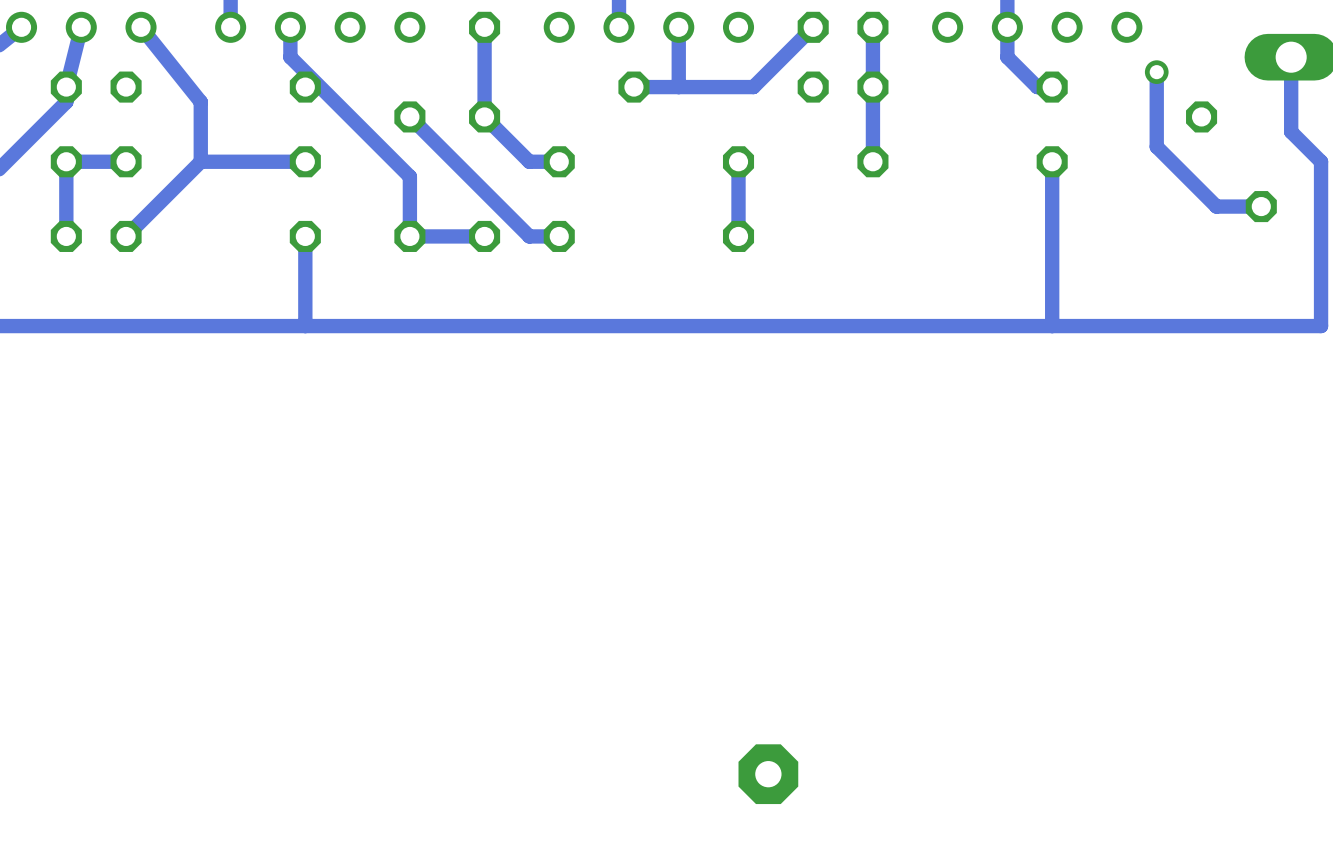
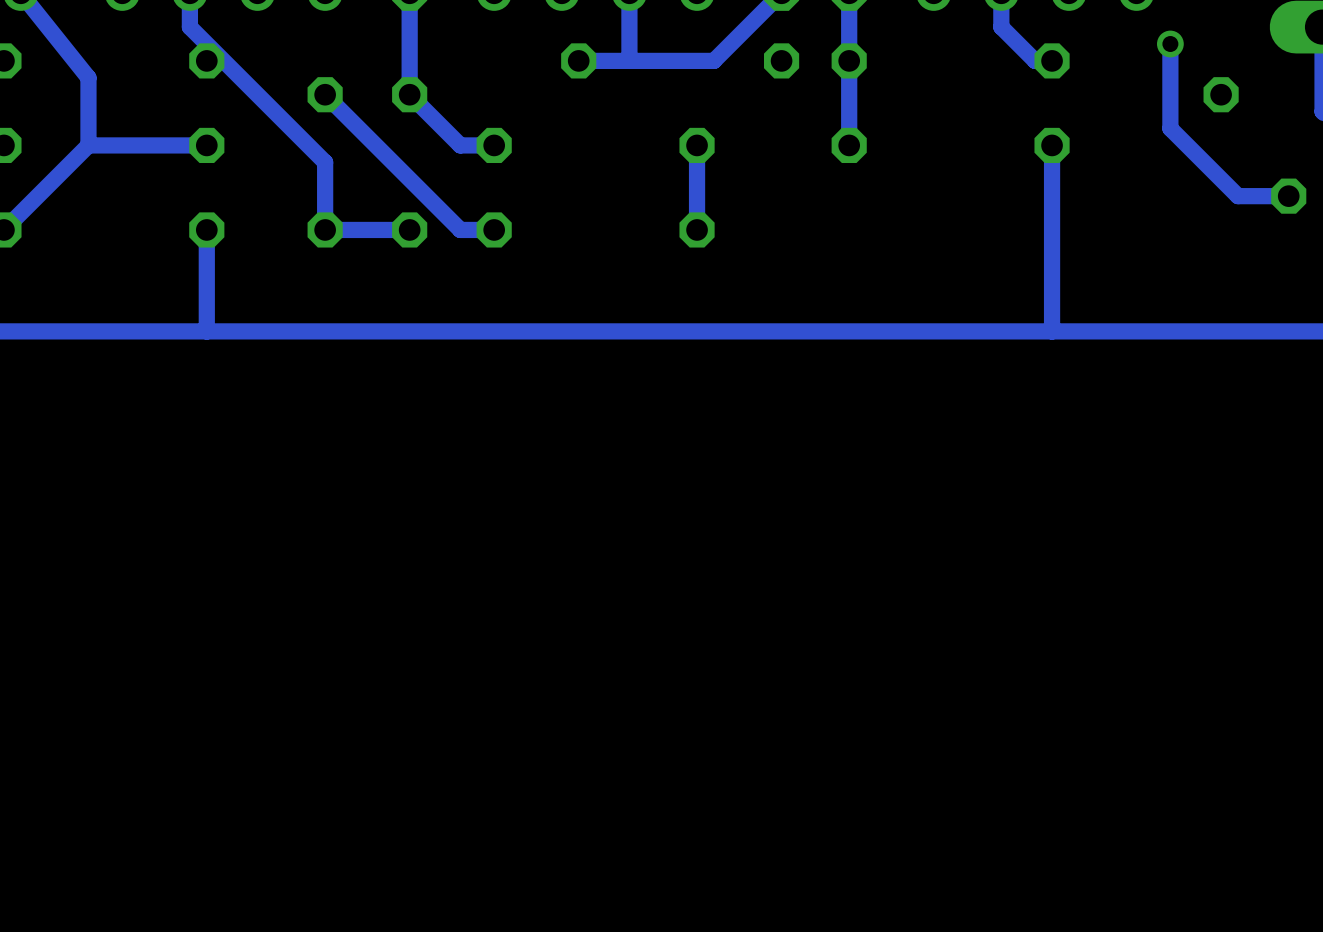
part: (768, 774) -> none

